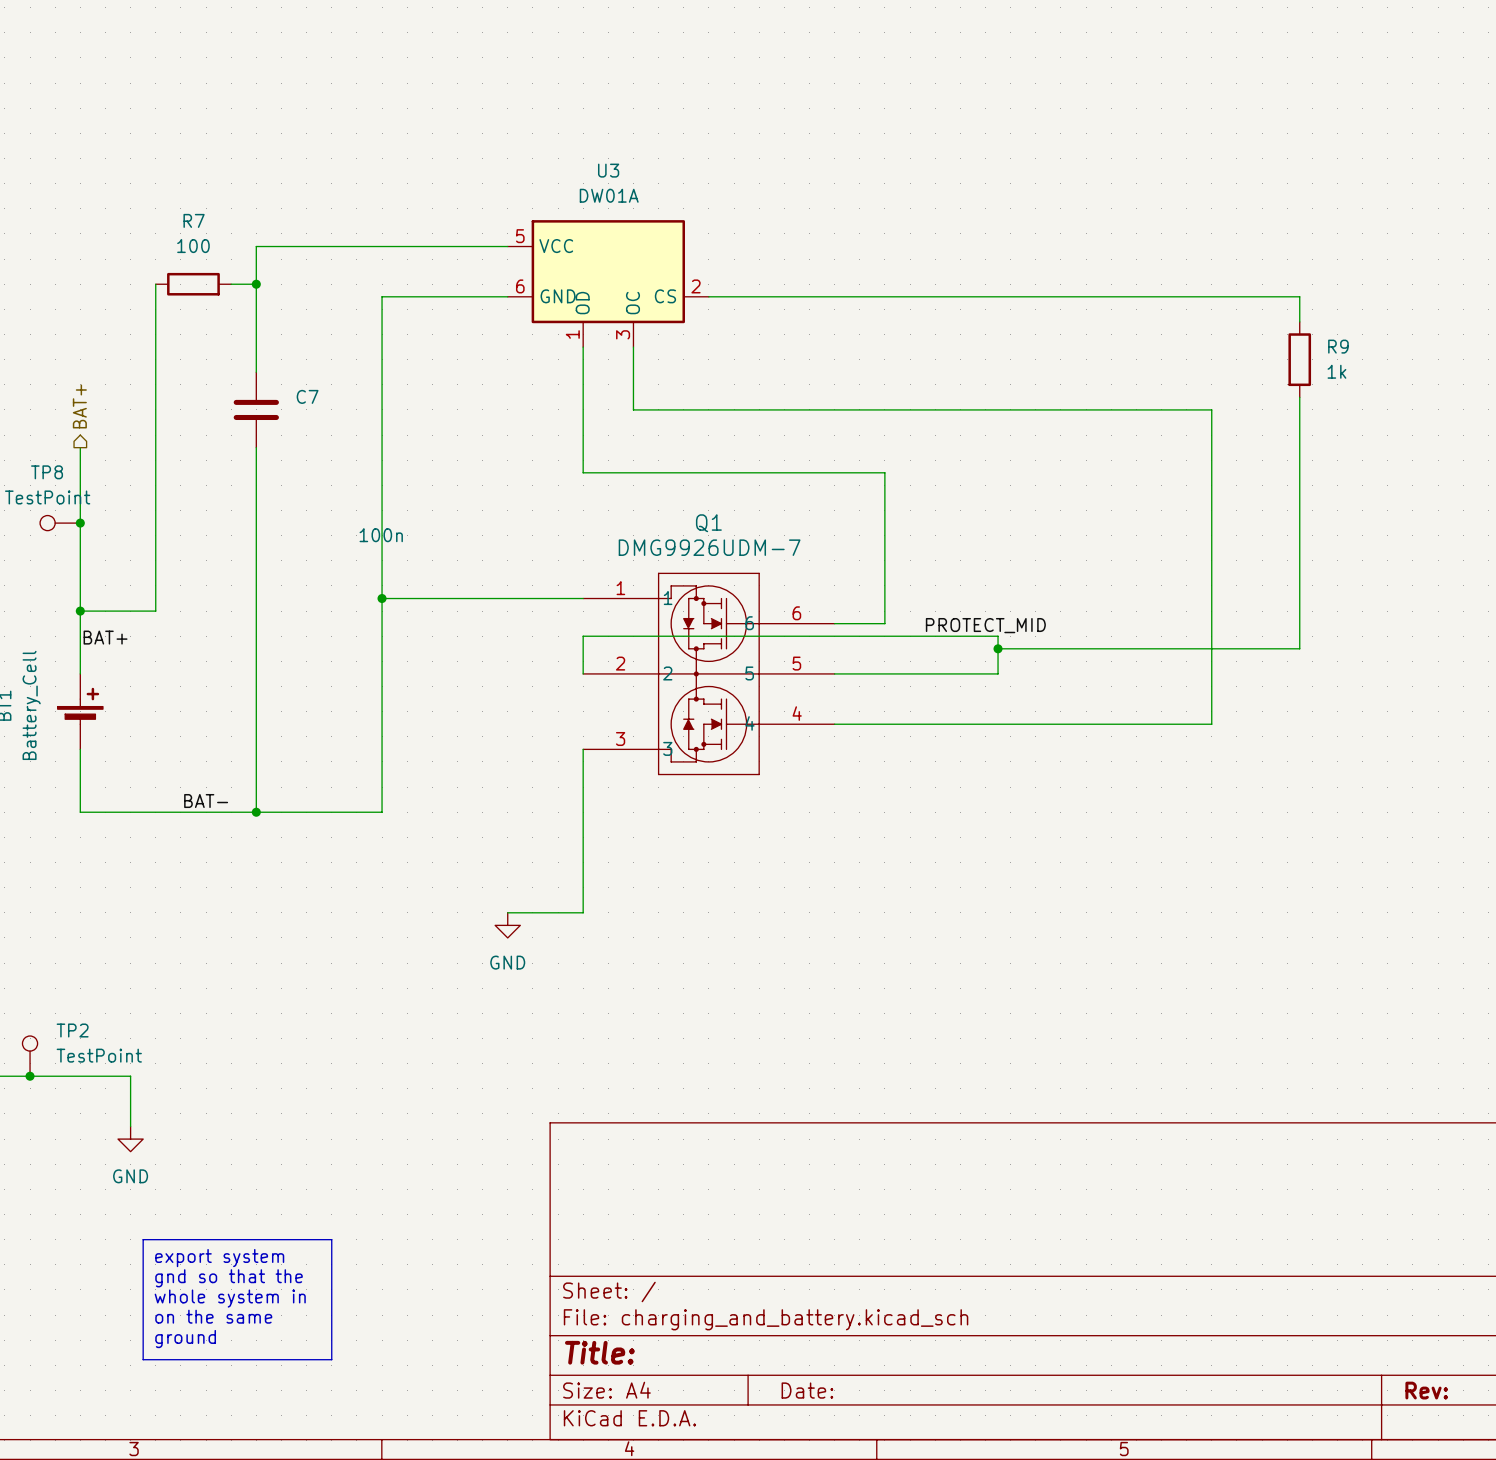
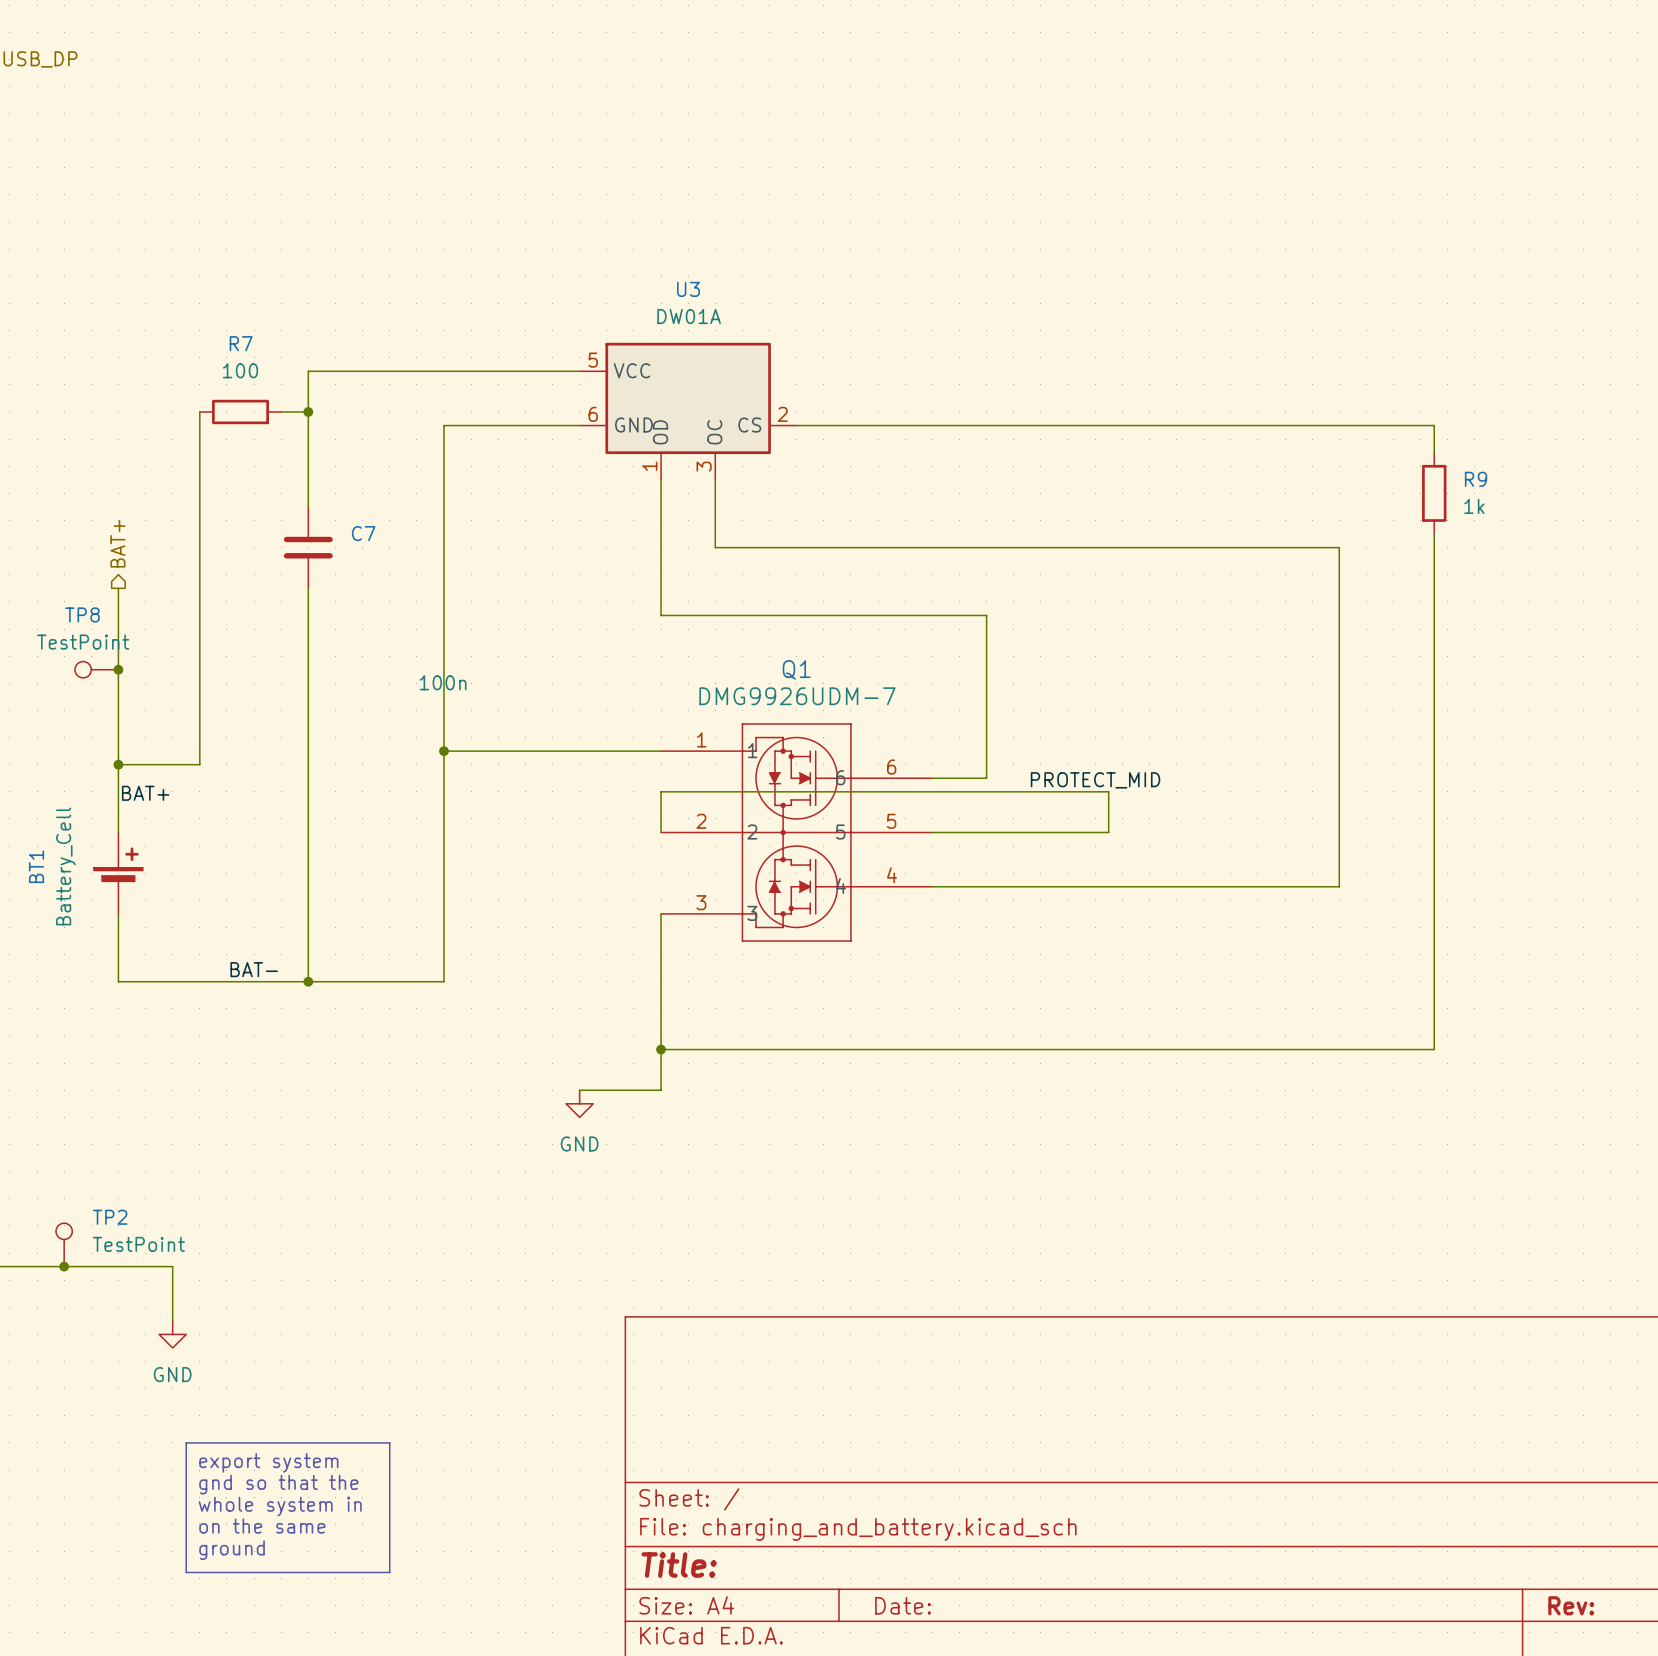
wire: (998, 648) (1299, 648) -> (661, 1049) (1434, 1049) (1434, 805)
junction: (998, 648) -> none
junction: none -> (661, 1049)

